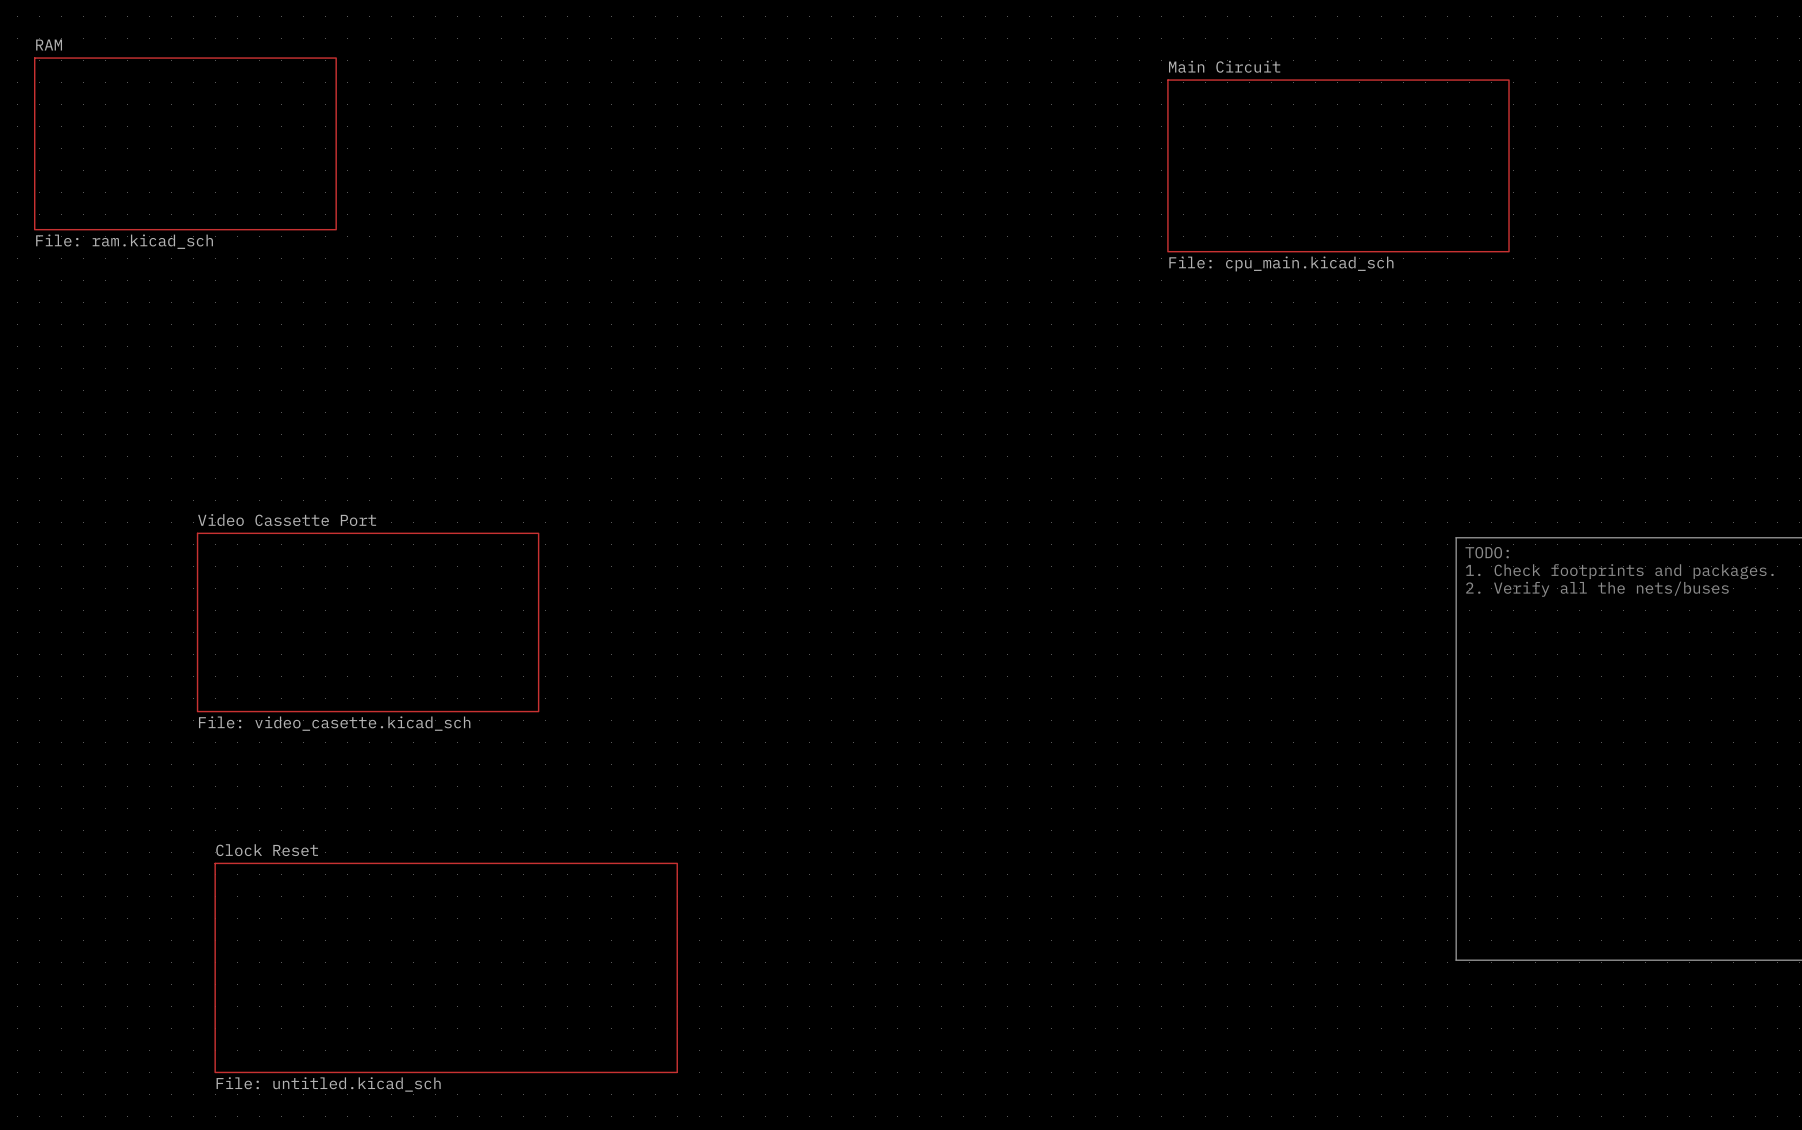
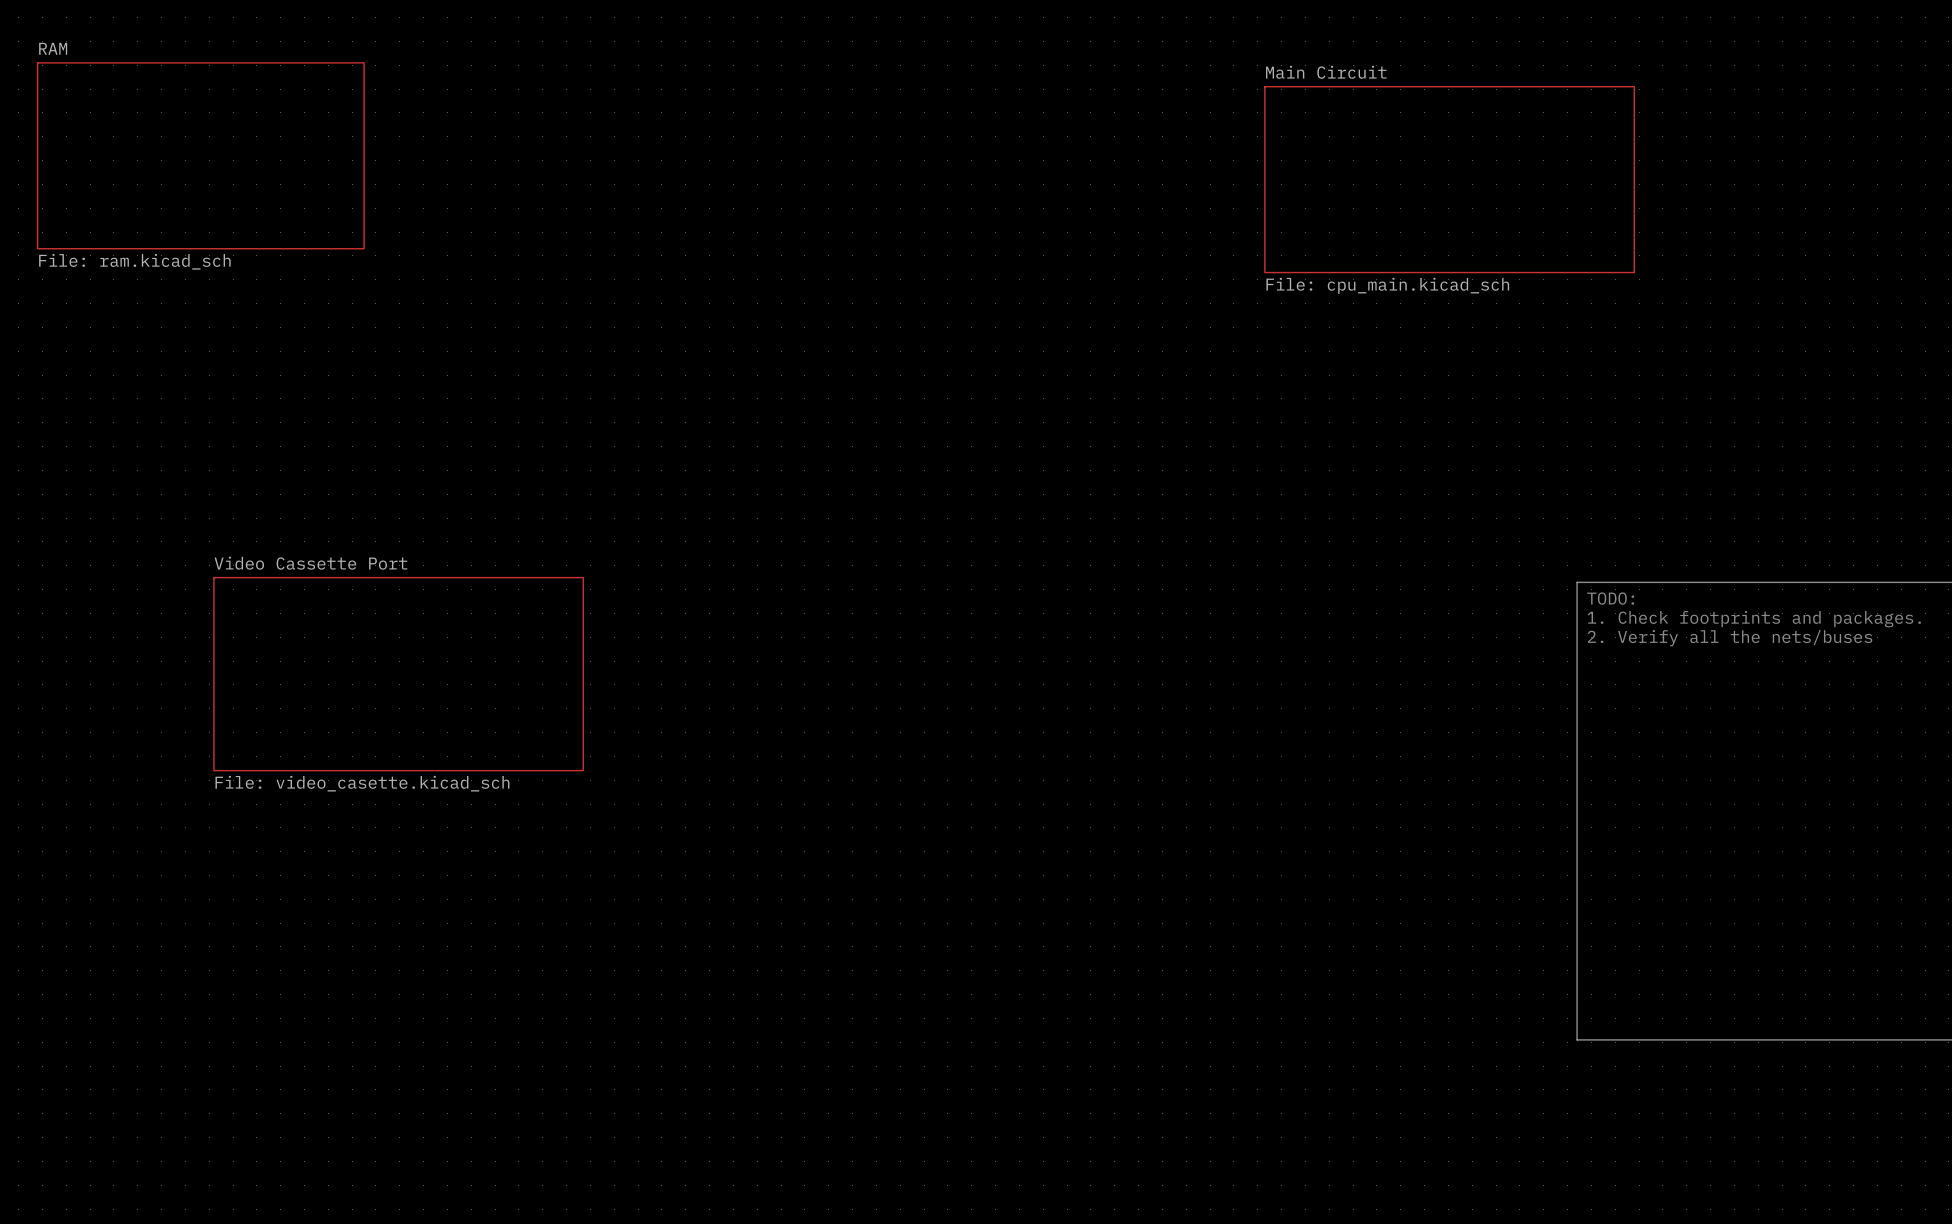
sheet Clock Reset: File: untitled.kicad_sch (446, 967) -> none

